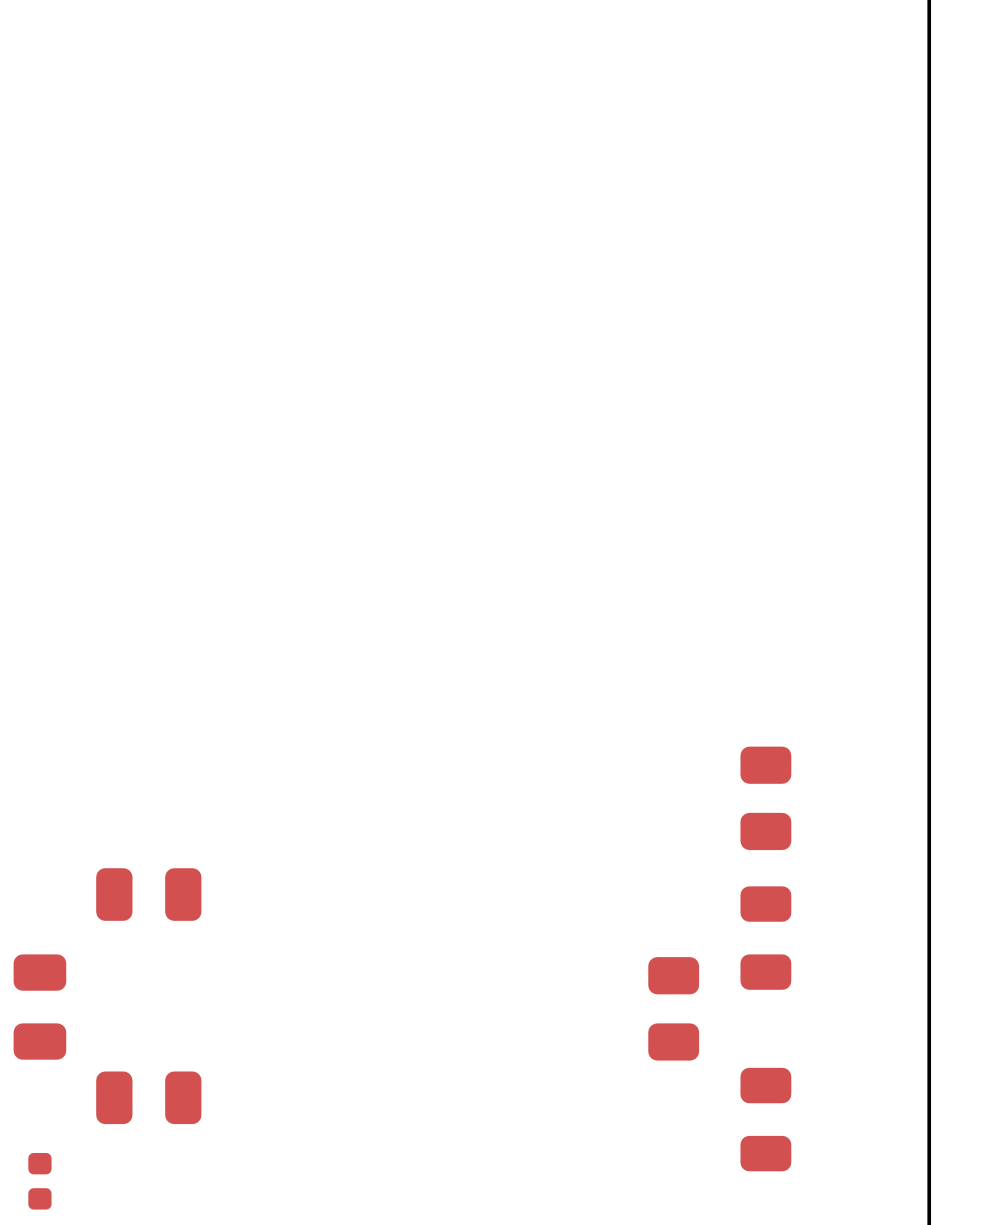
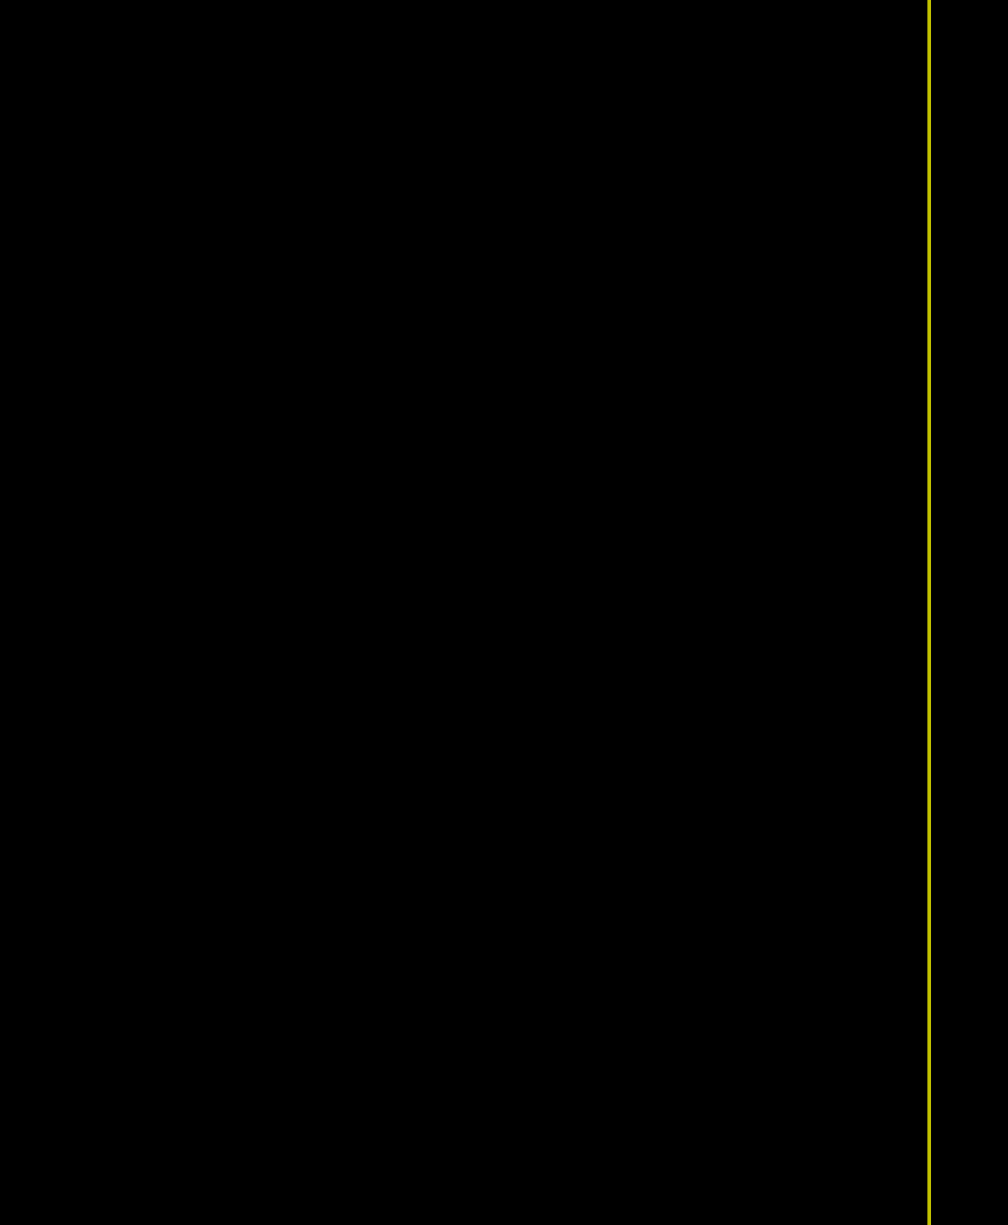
part: (765, 798) -> none
part: (148, 894) -> none
part: (765, 938) -> none
part: (39, 1007) -> none
part: (673, 1008) -> none
part: (148, 1097) -> none
part: (765, 1119) -> none
part: (39, 1181) -> none

